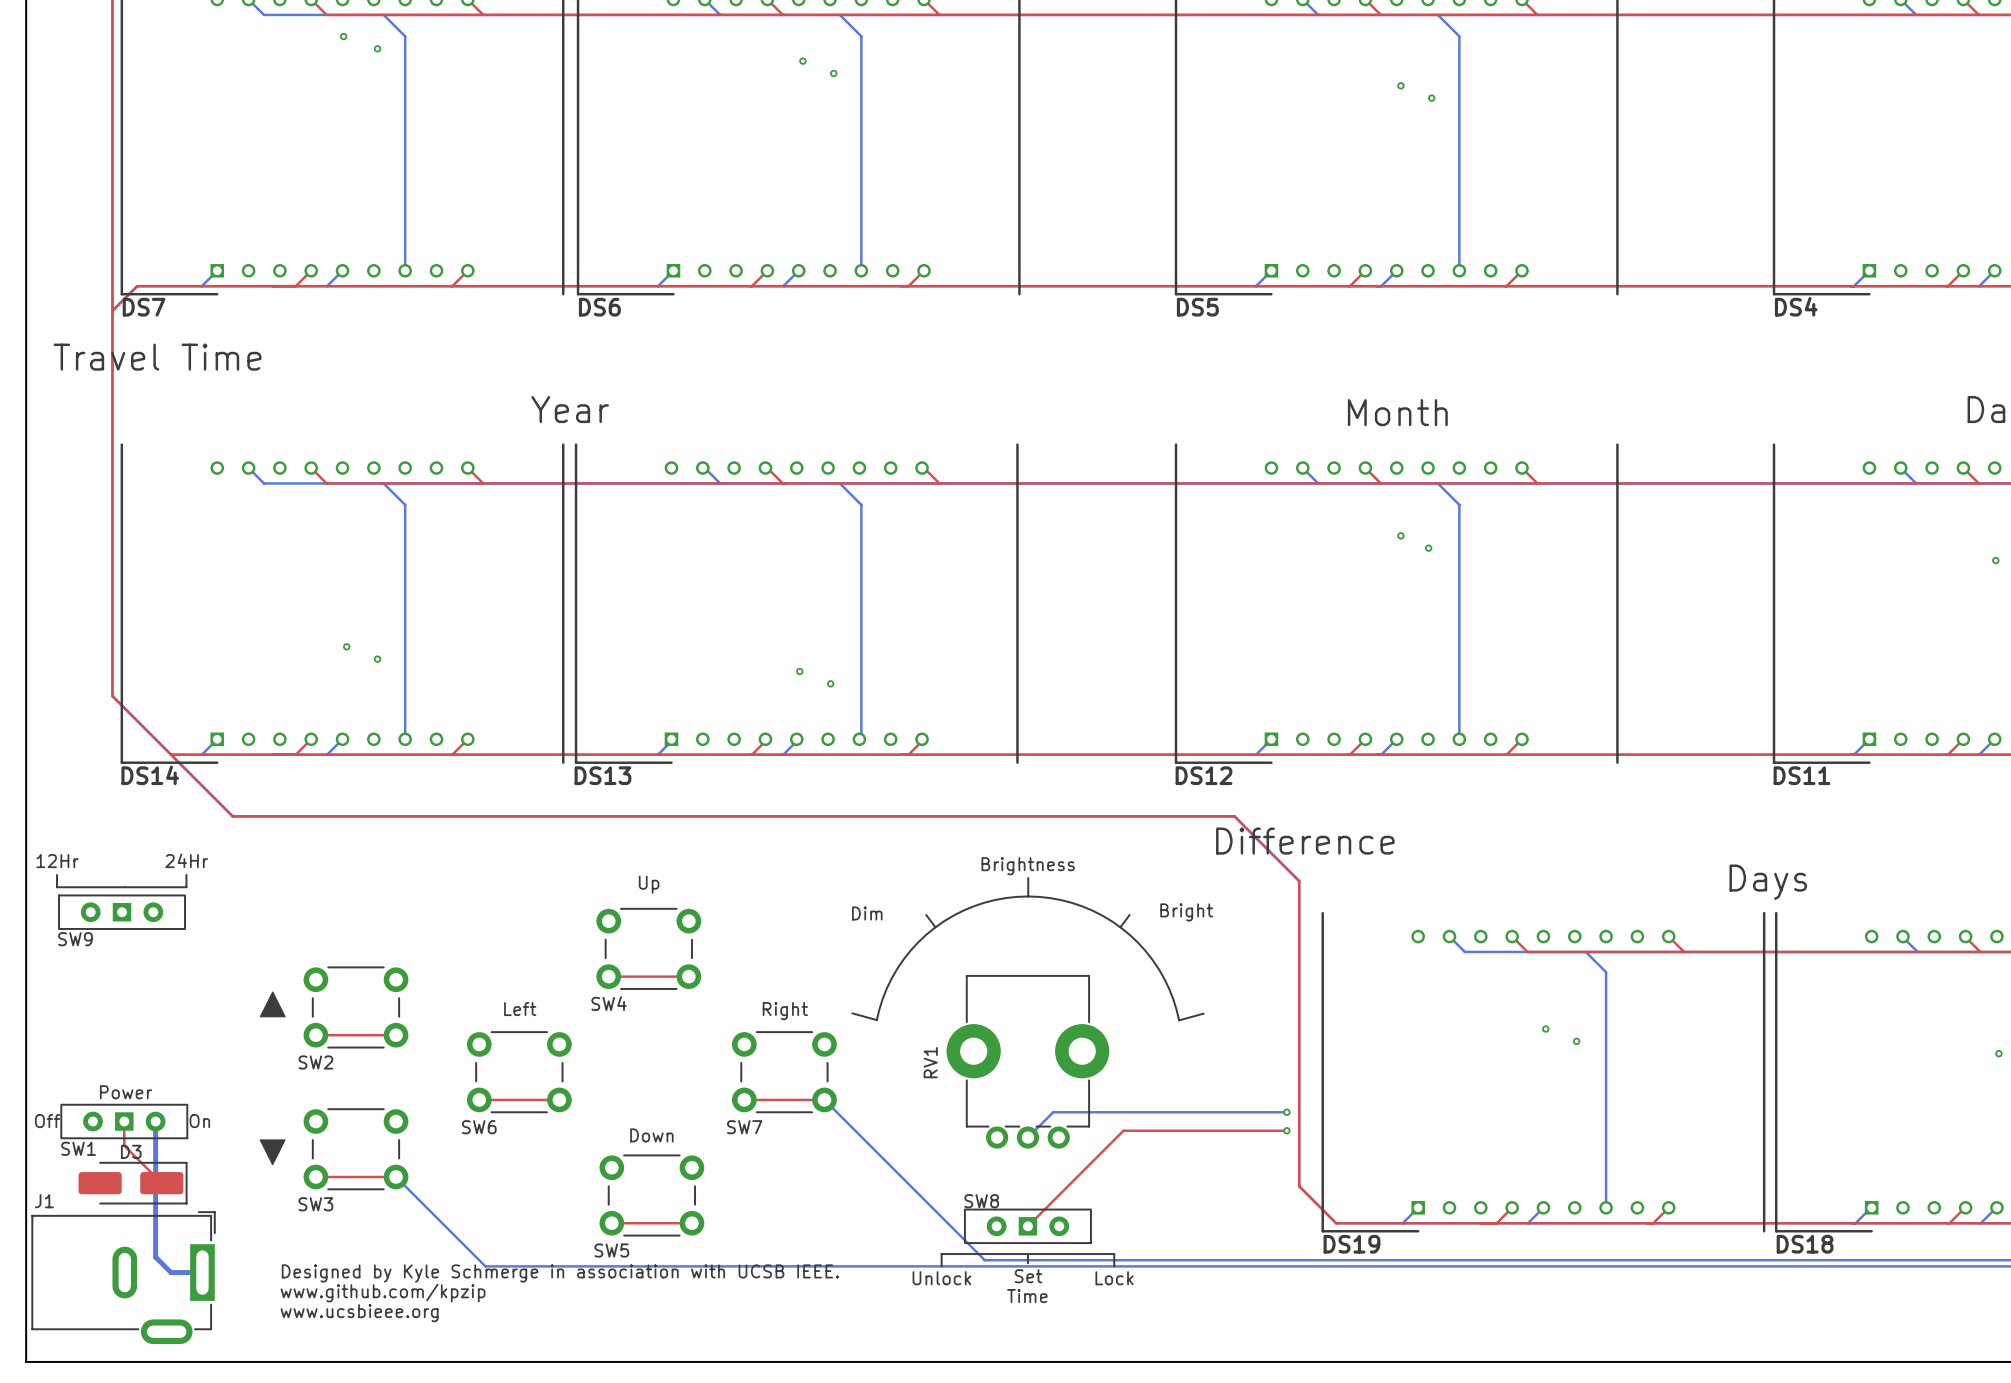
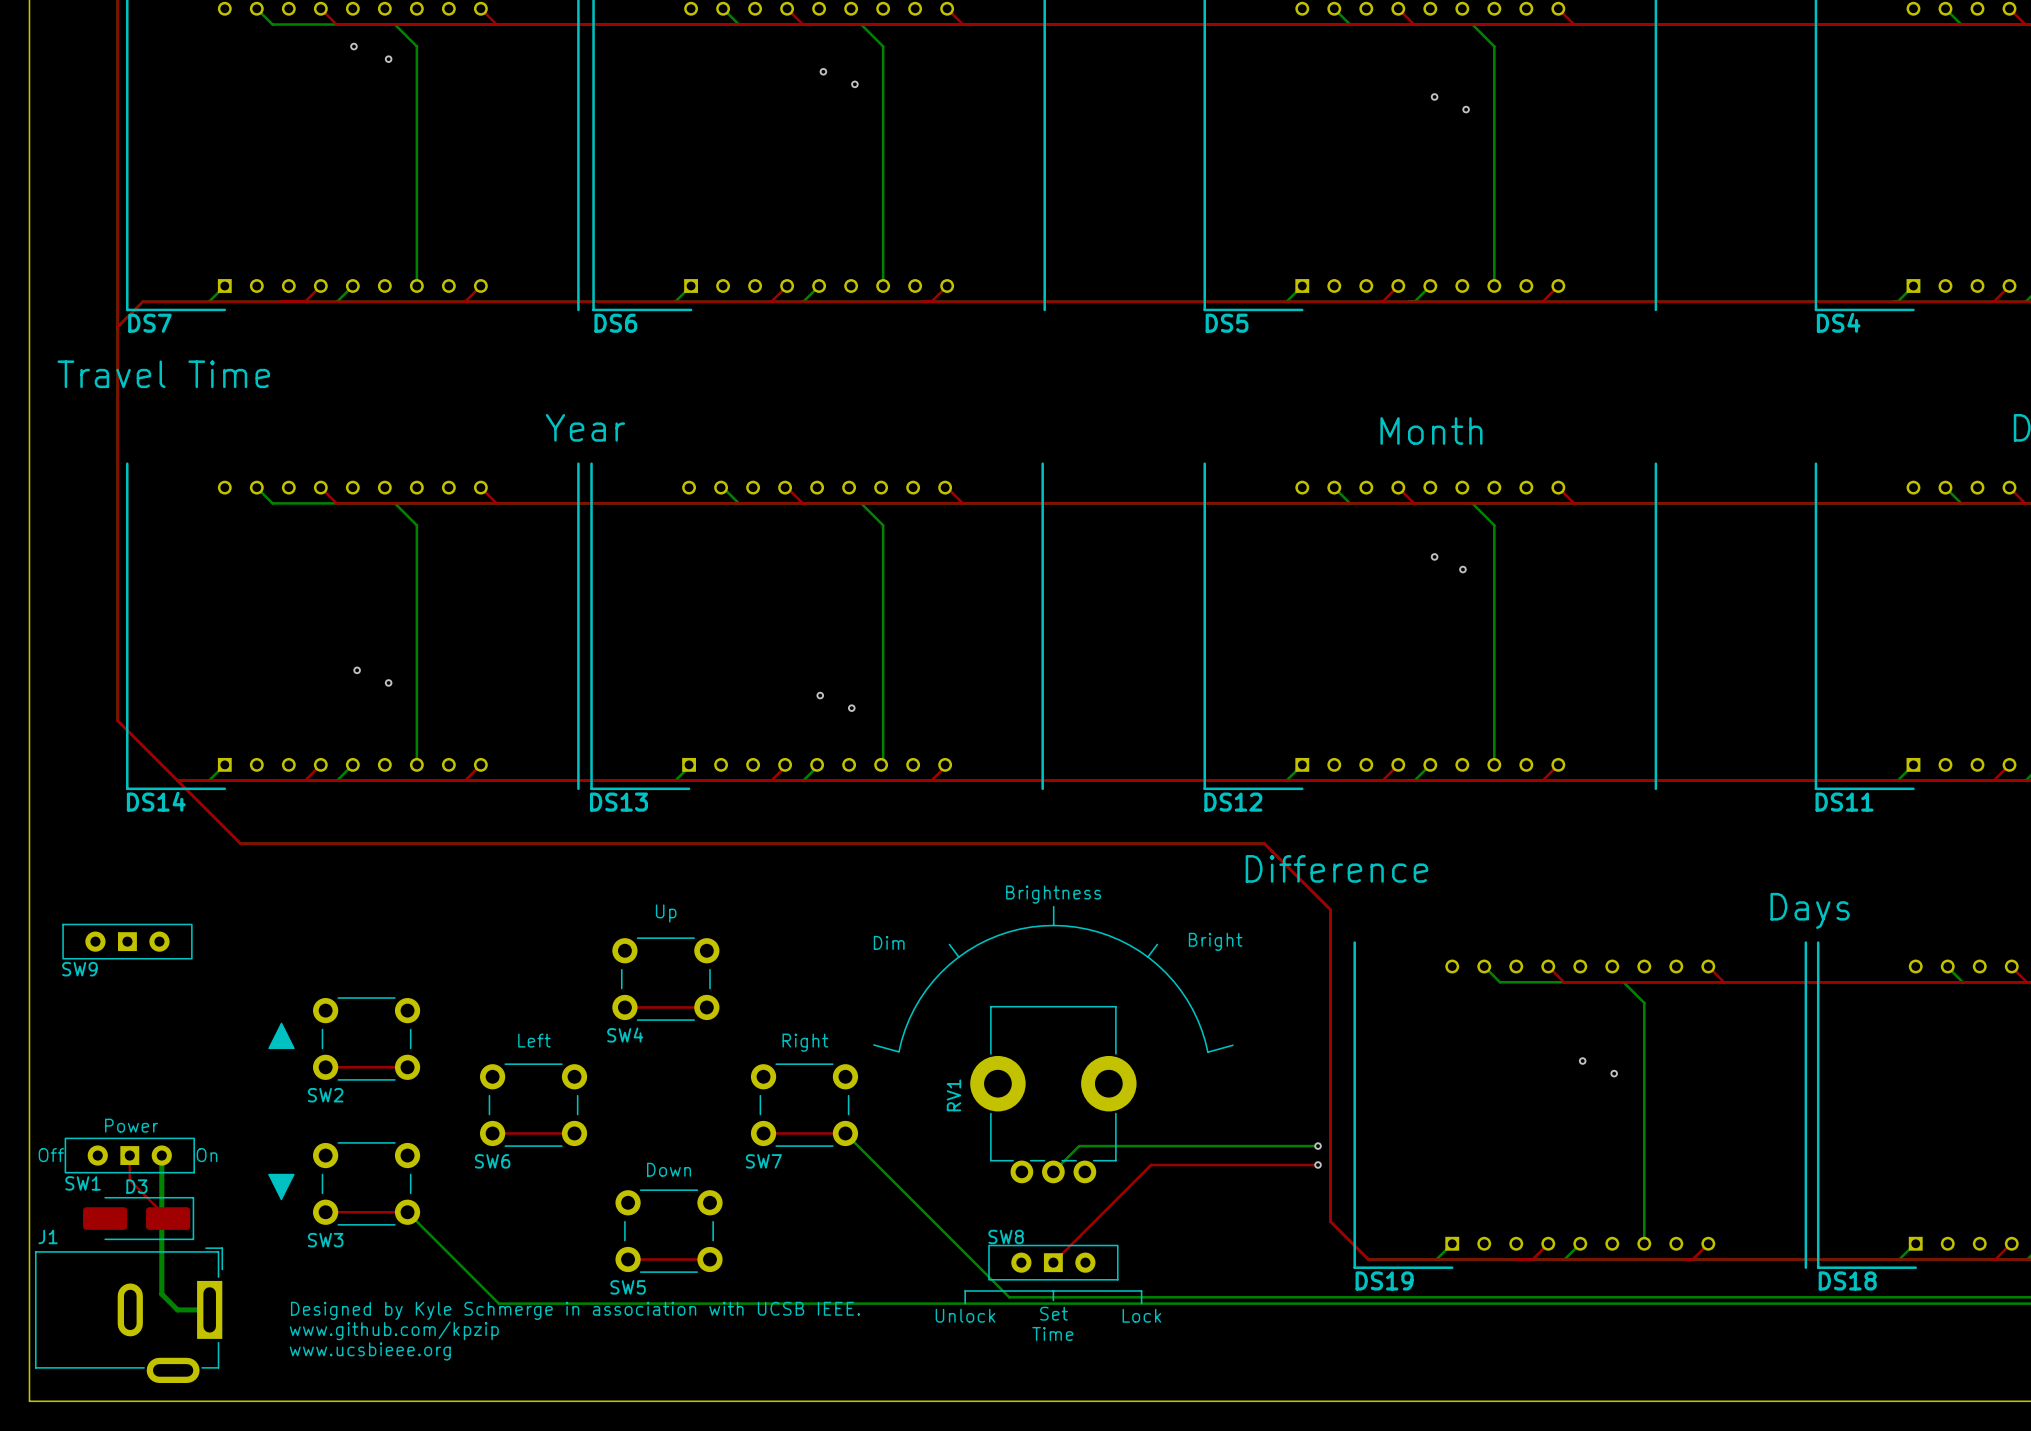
text: 24Hr (186, 860) -> none
text: 12Hr (57, 861) -> none
line: (56, 874) (56, 887) (186, 887) (186, 874) -> none

